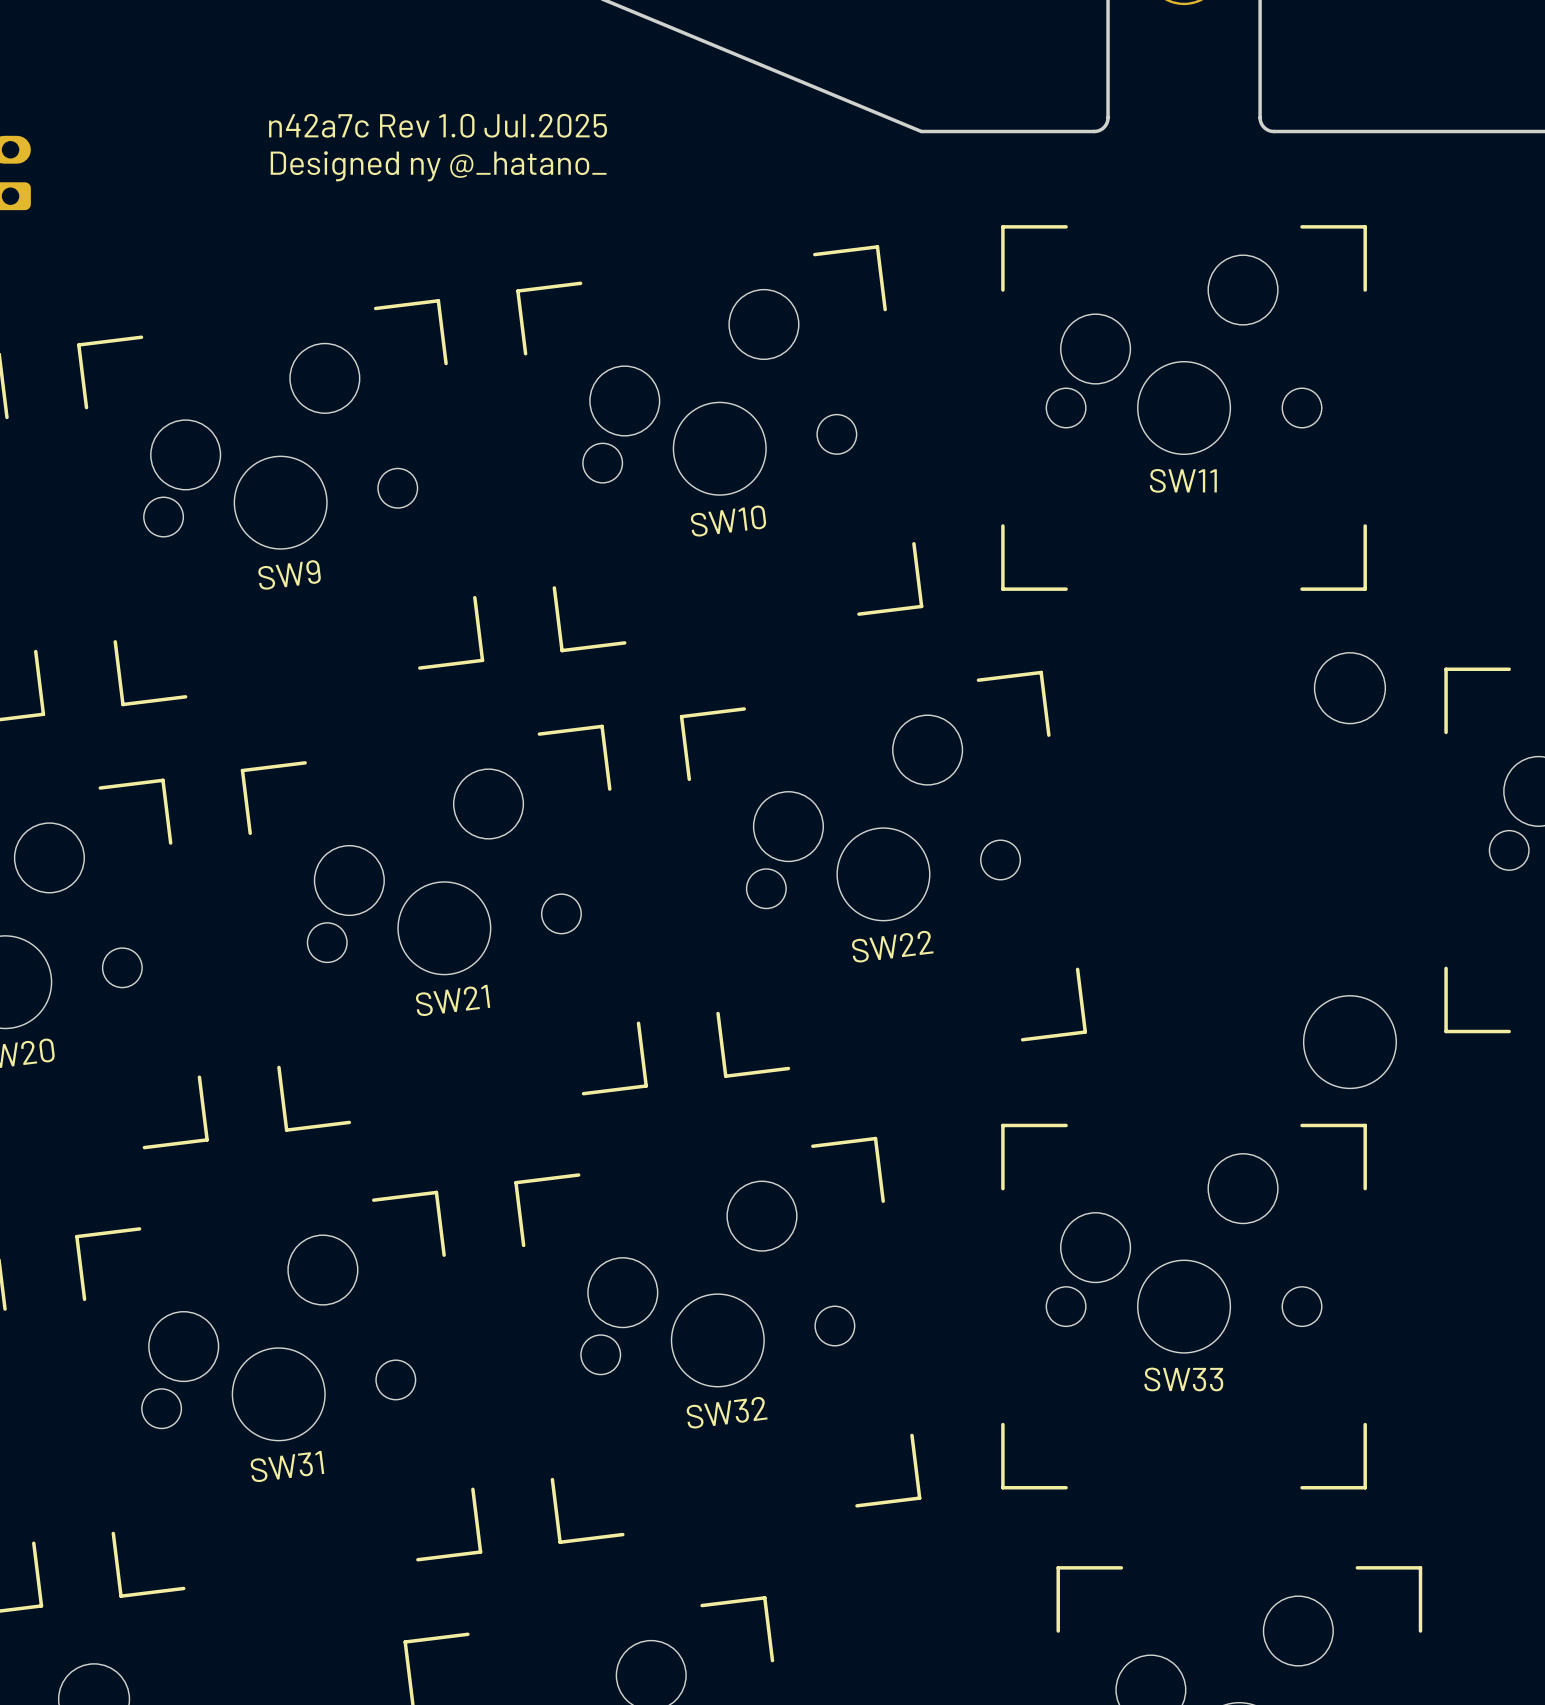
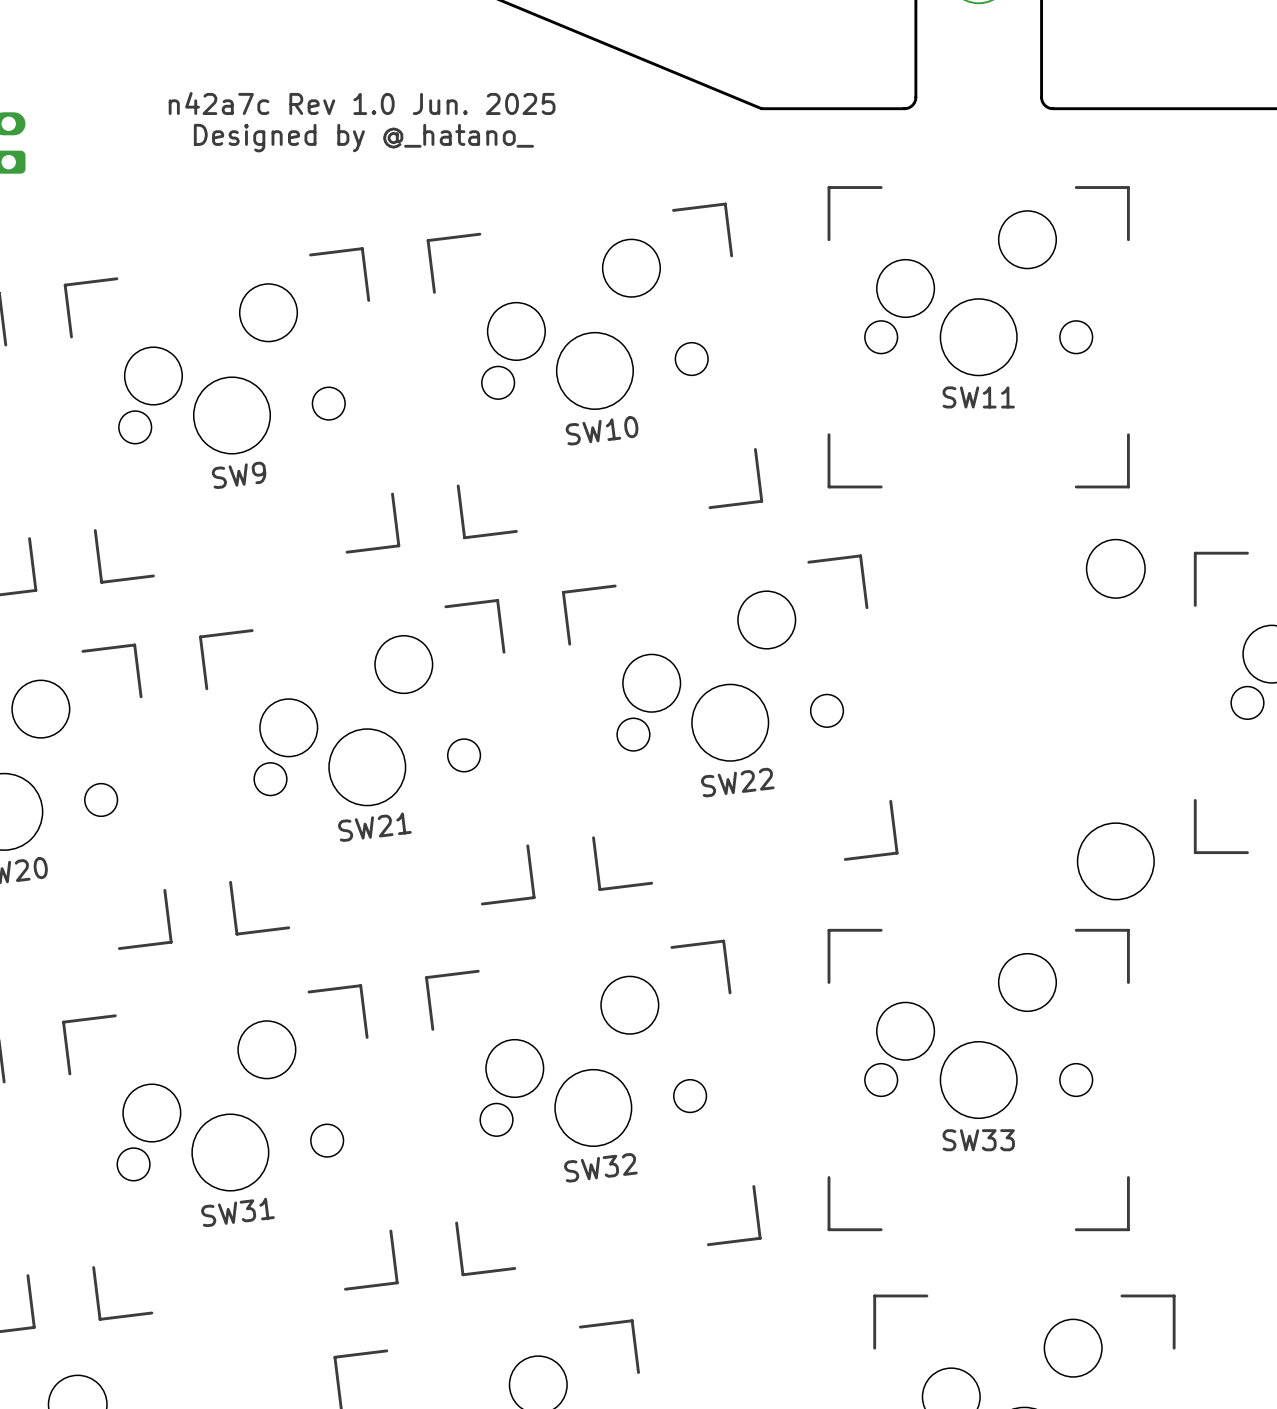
text: n42a7c Rev 1.0 Jul.2025 (438, 125) -> n42a7c Rev 1.0 Jun. 2025 (362, 103)
text: Designed ny @_hatano_ (438, 166) -> Designed by @_hatano_ (363, 138)

